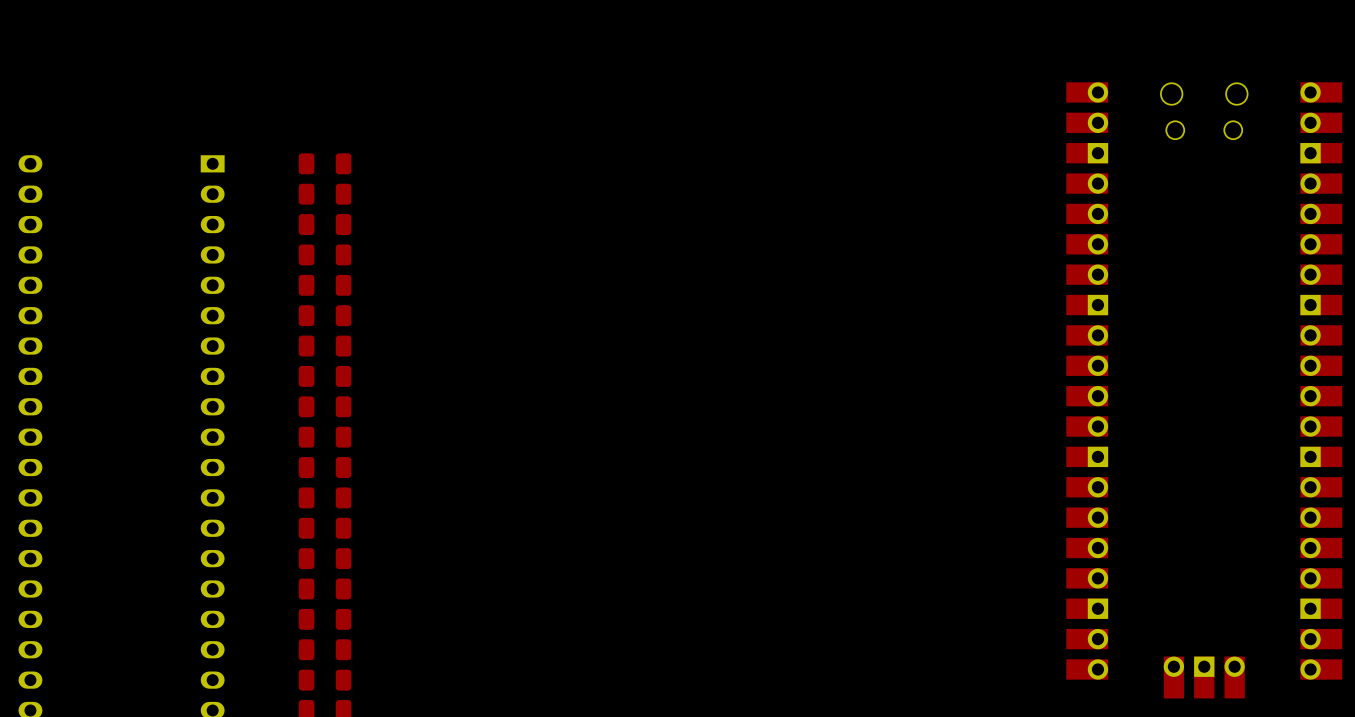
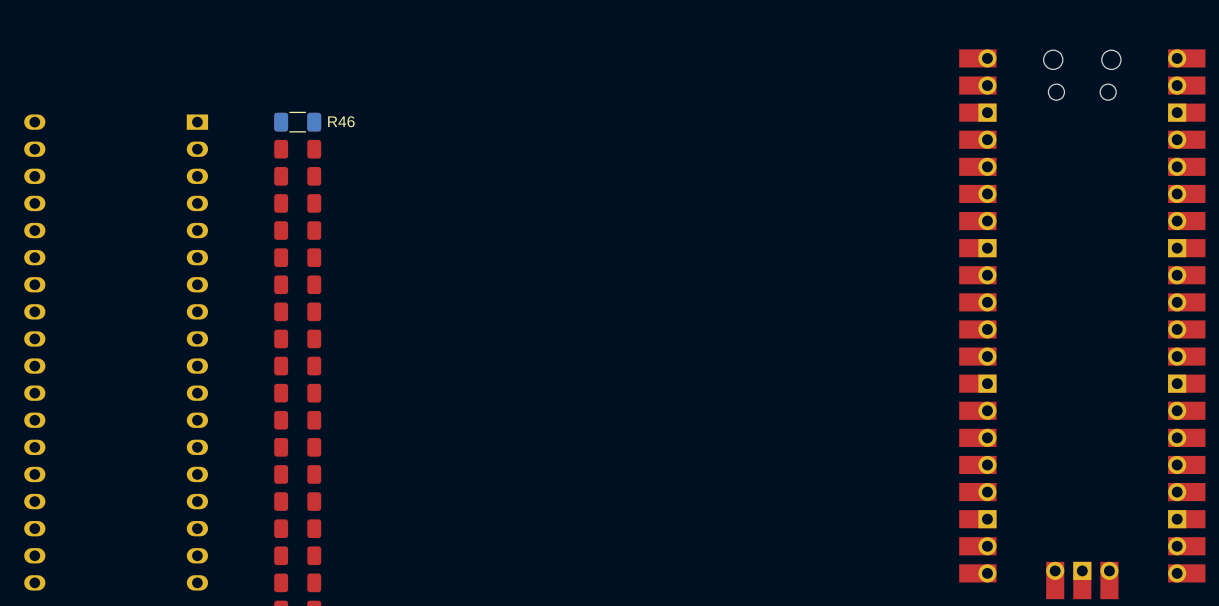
R46: none -> (297, 122)

